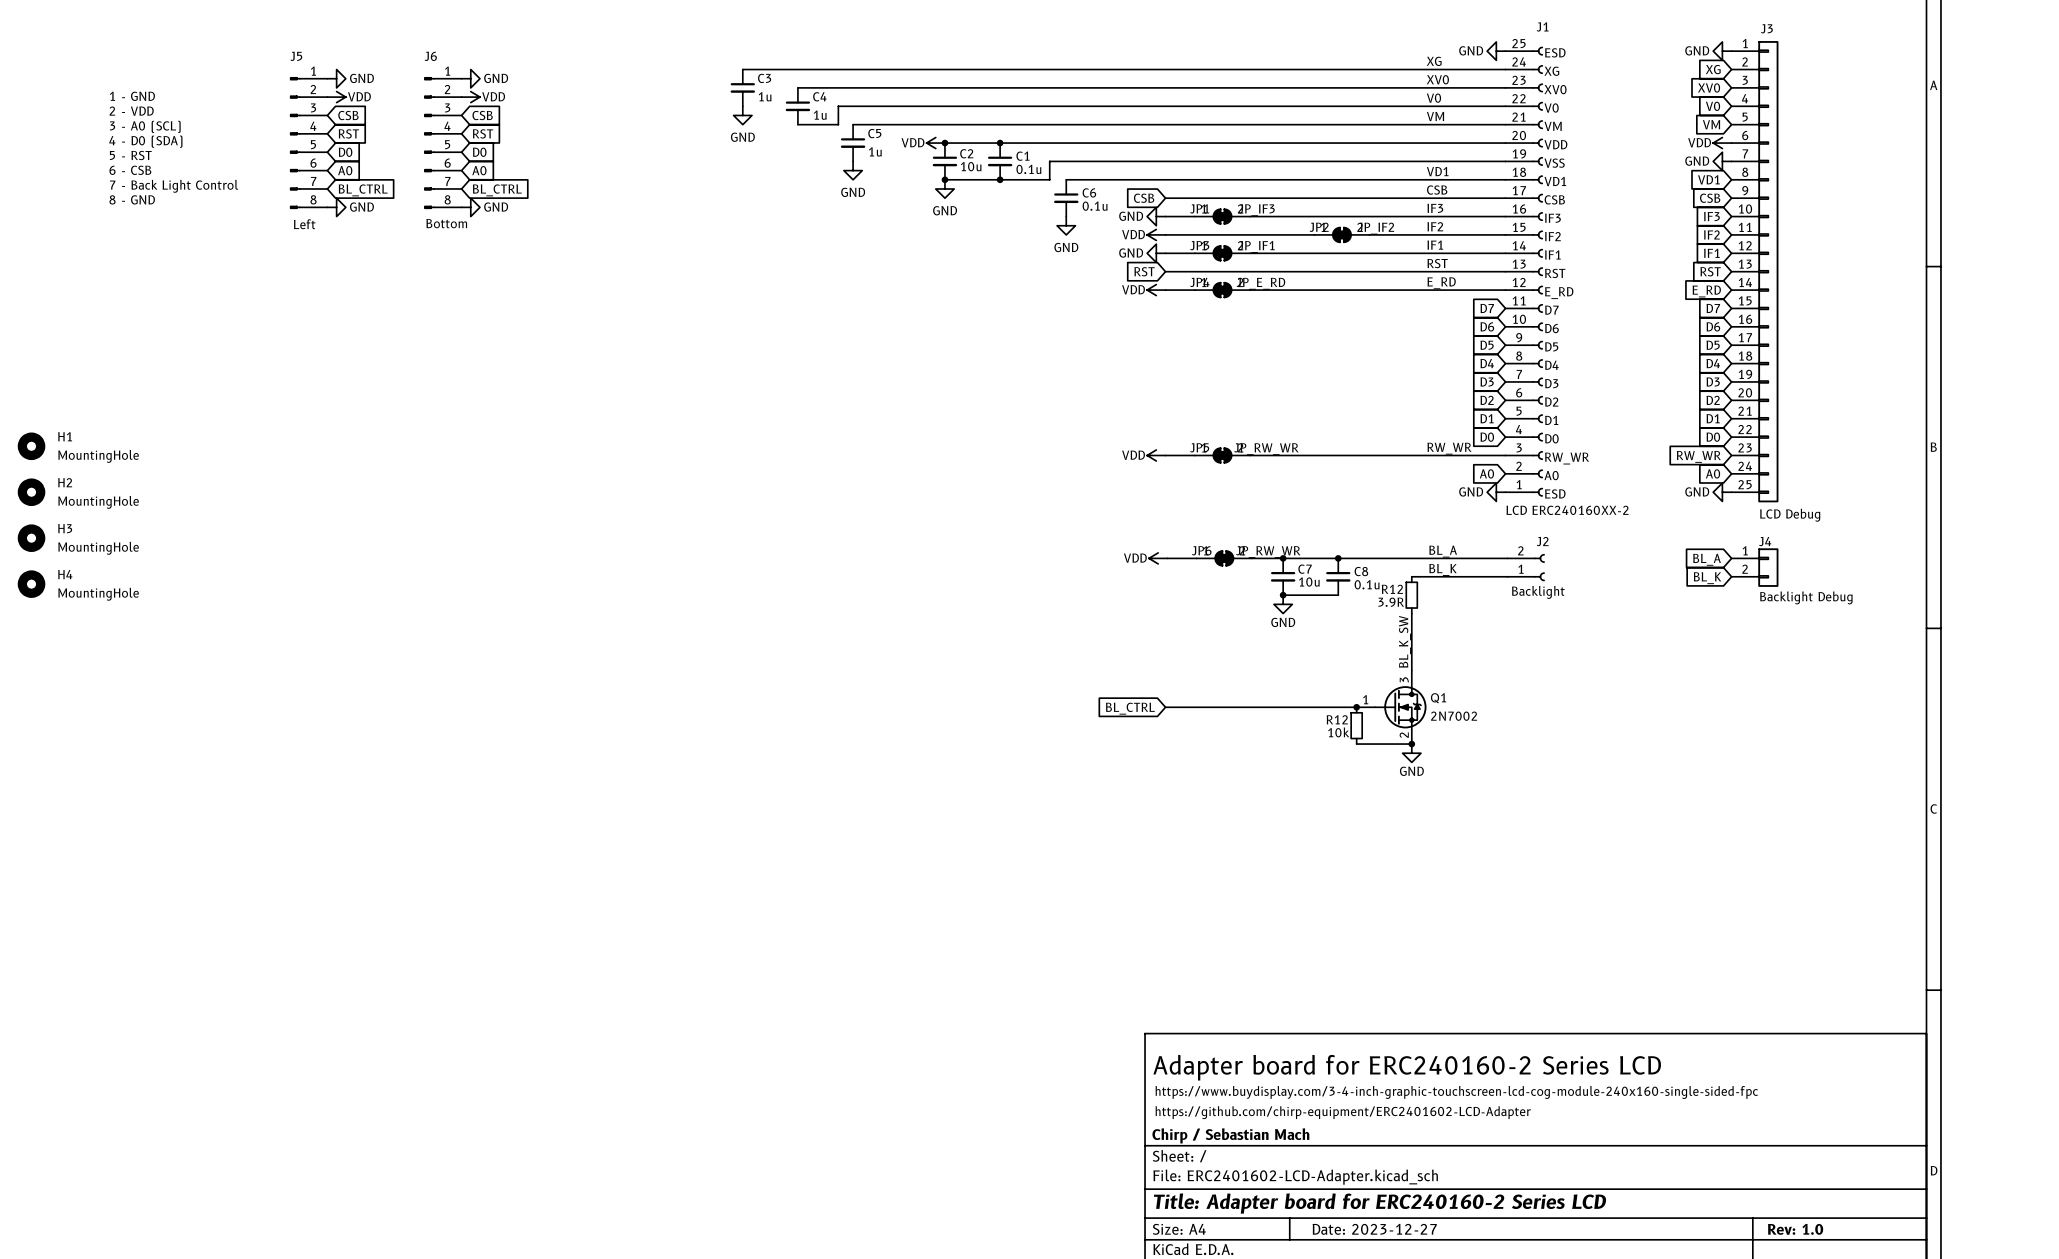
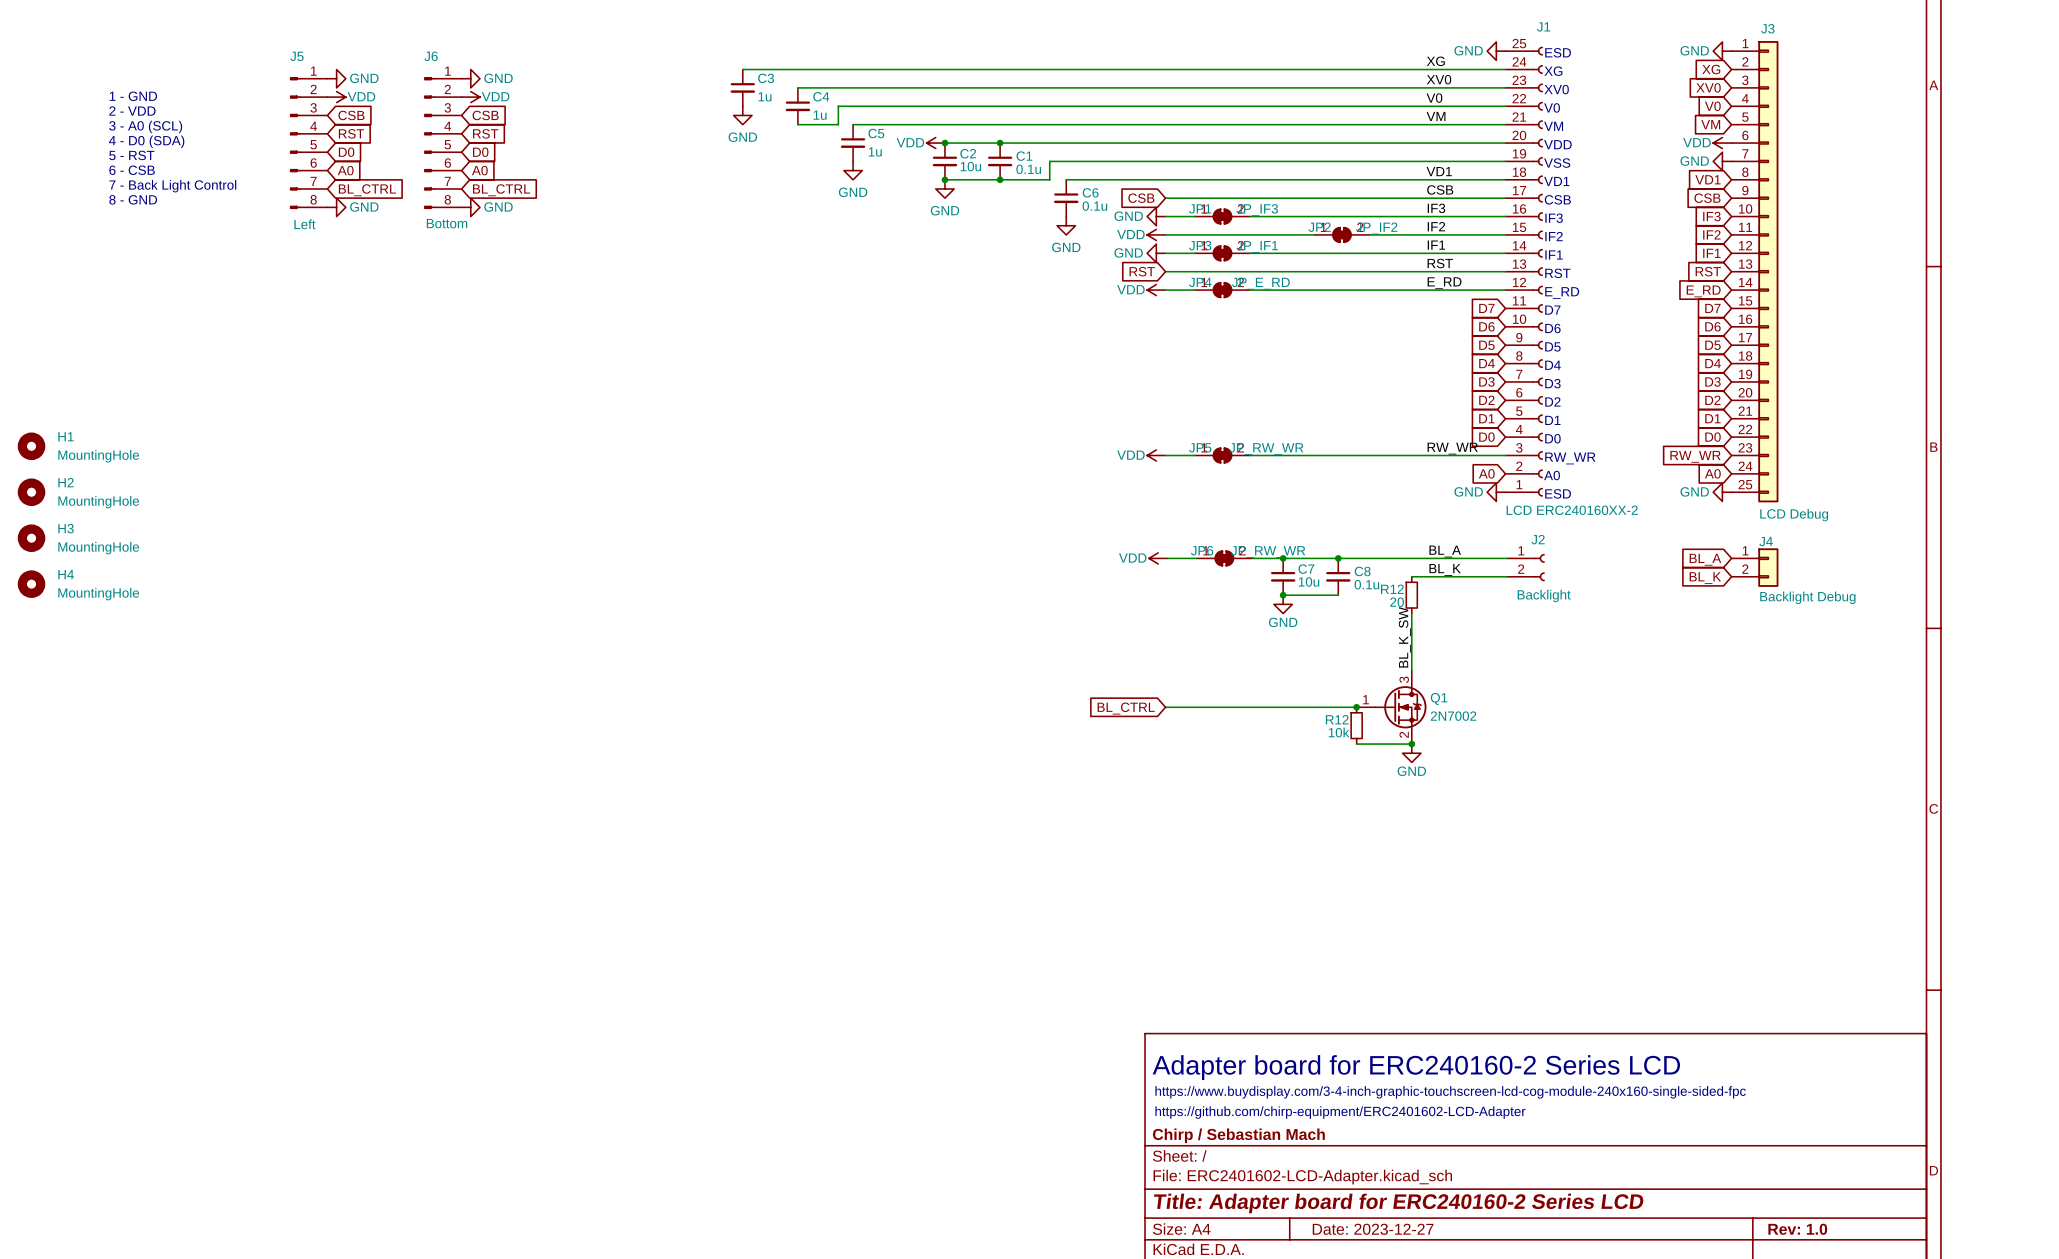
J2 flip: as is (1539, 567) -> up-down (1539, 567)
R12 value: 3.9R (1391, 602) -> 20 (1397, 602)

